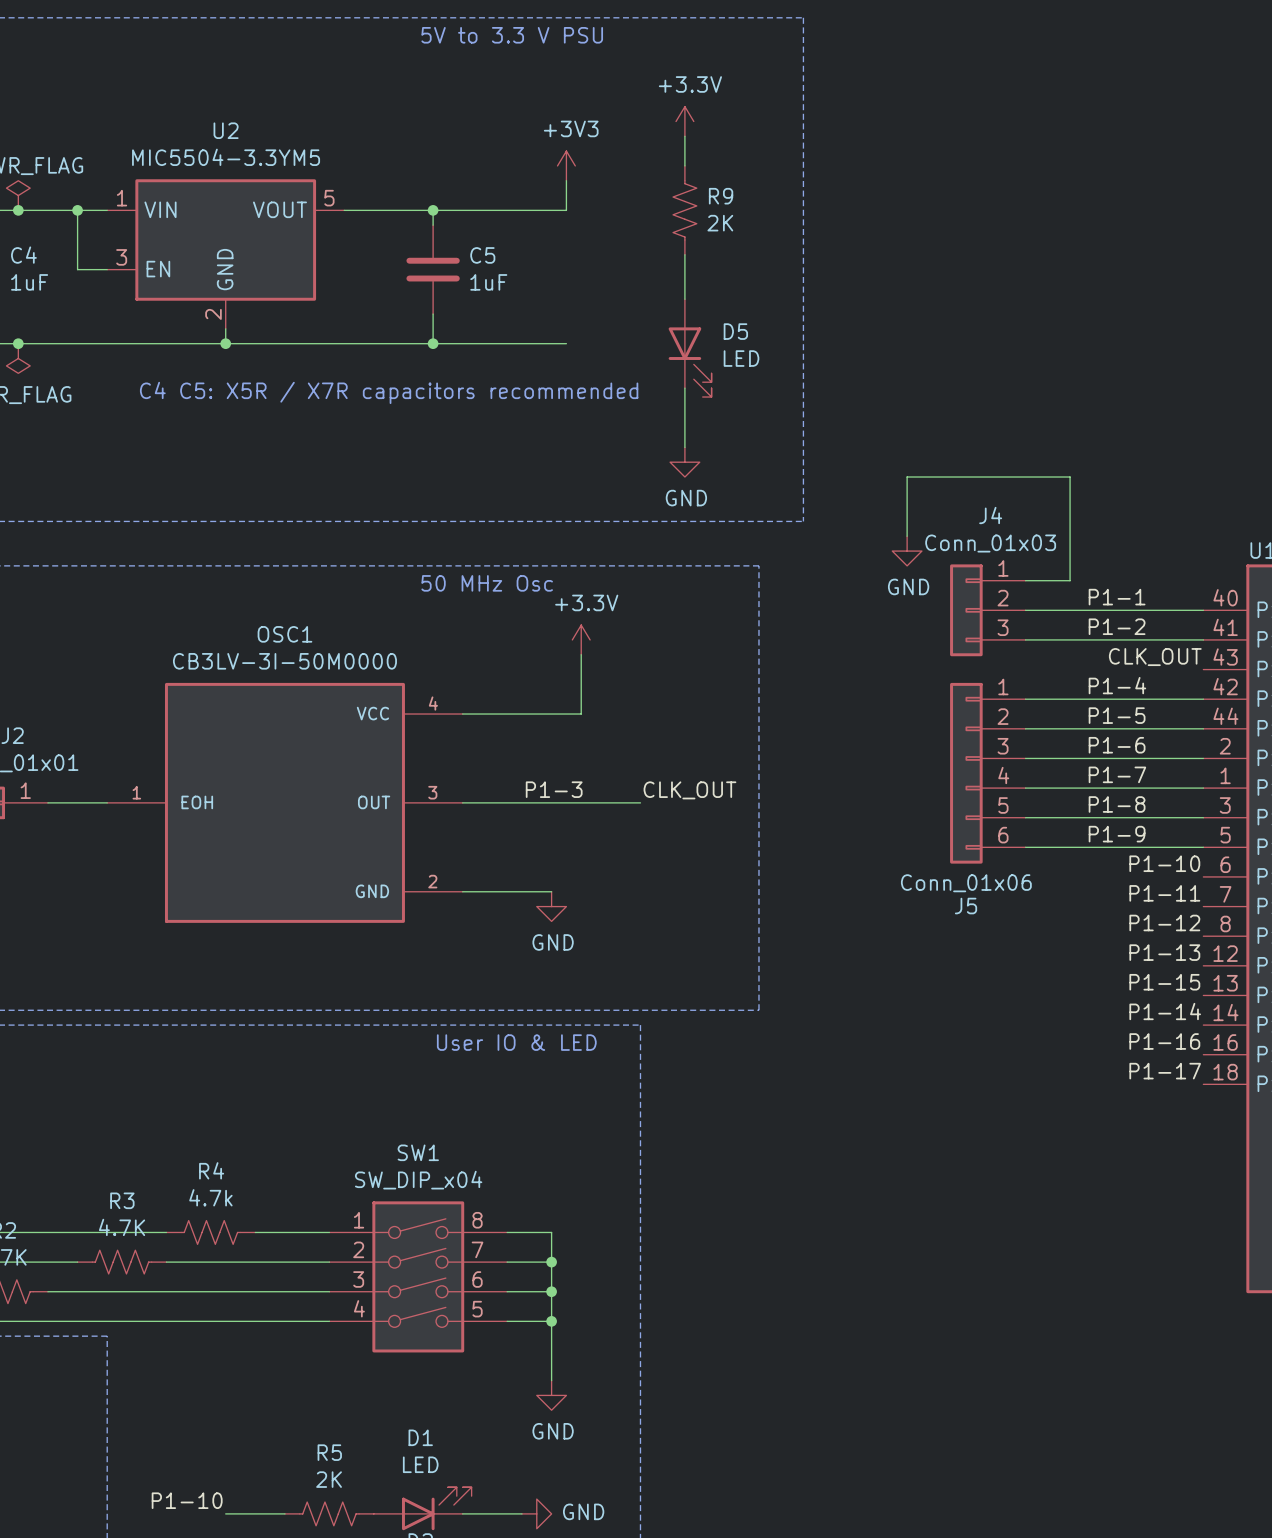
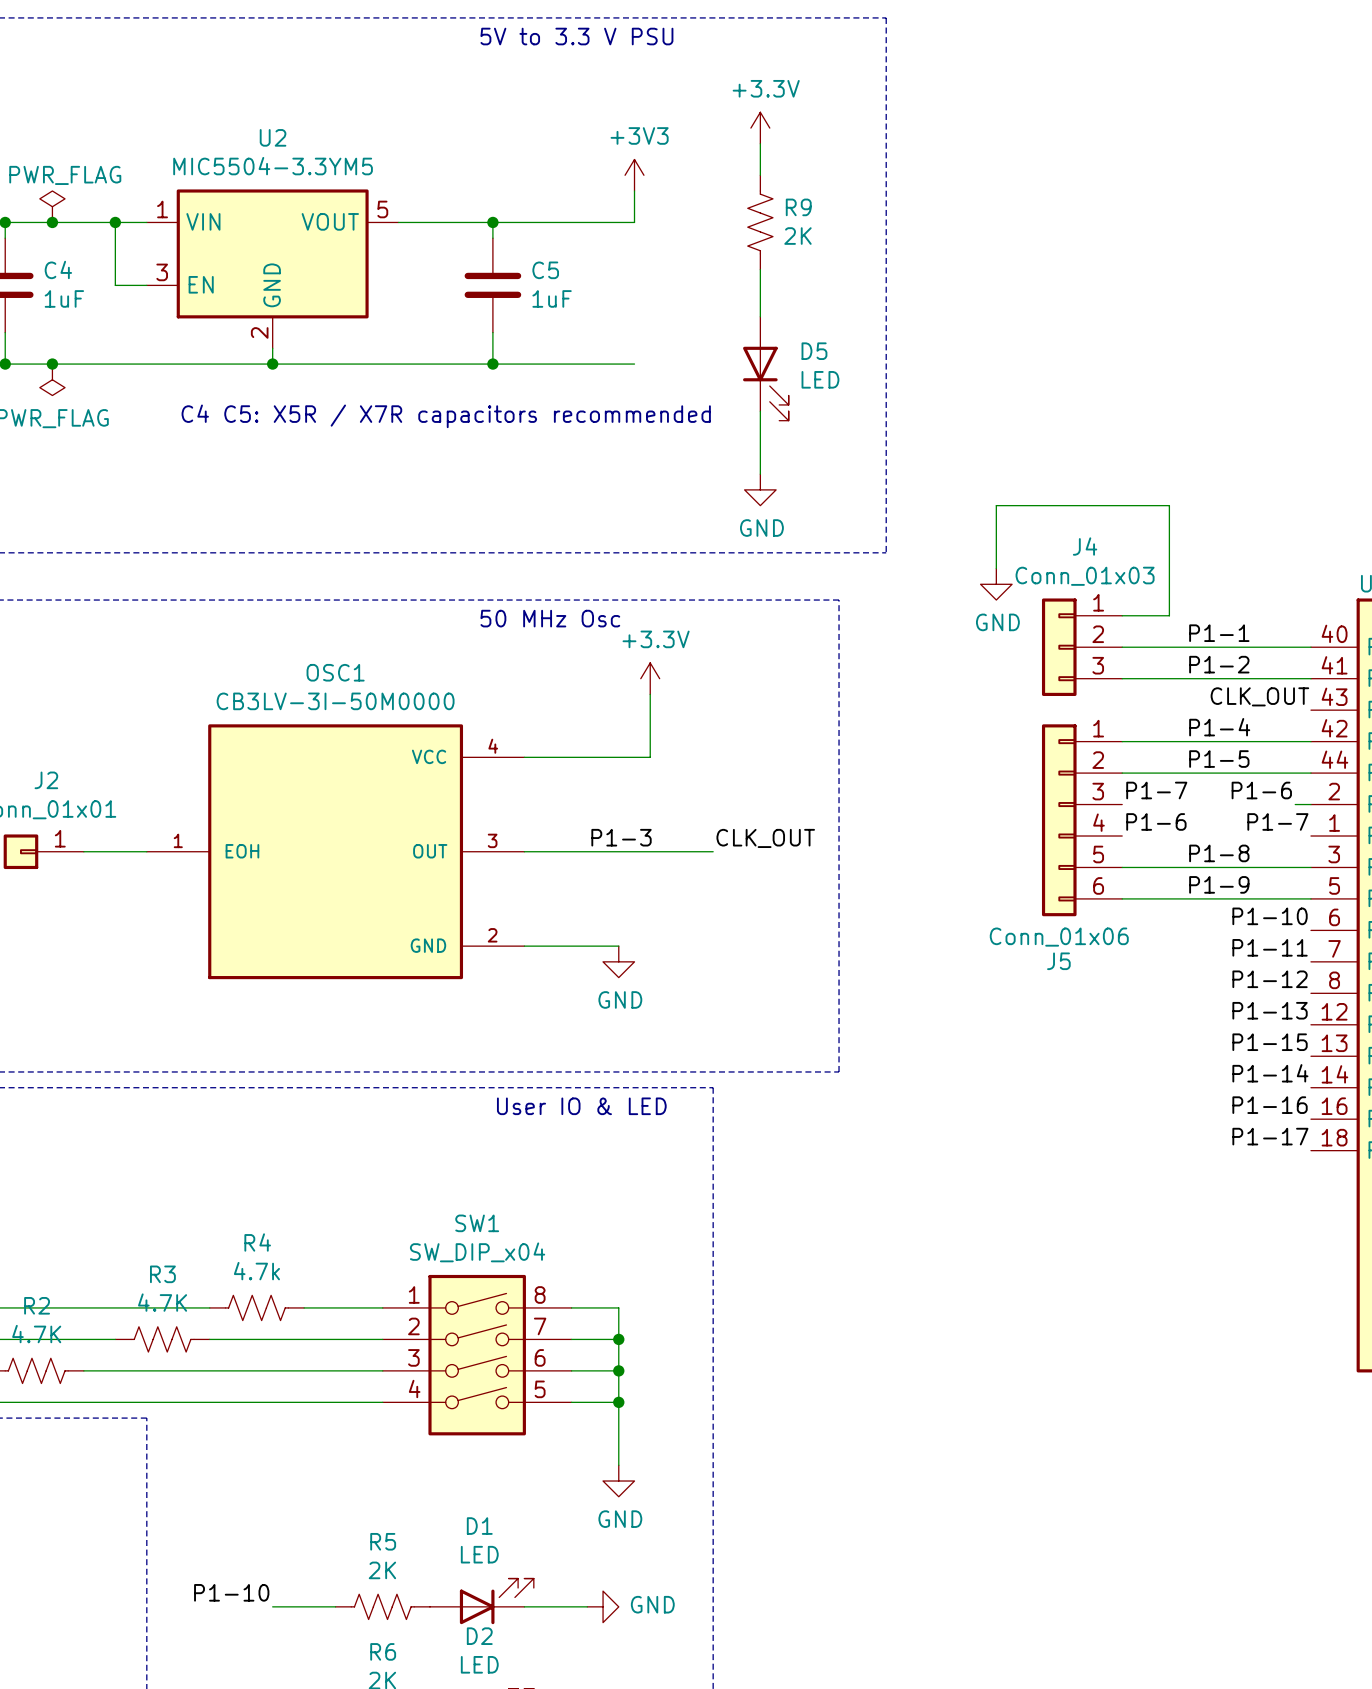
label: none -> P1-7 (1156, 790)
label: P1-6 (1117, 745) -> none
label: none -> P1-6 (1261, 790)
wire: (1025, 758) (1188, 758) -> none
label: none -> P1-6 (1156, 821)
label: P1-7 (1117, 774) -> none
label: none -> P1-7 (1277, 821)
wire: (1025, 788) (1203, 788) -> none

